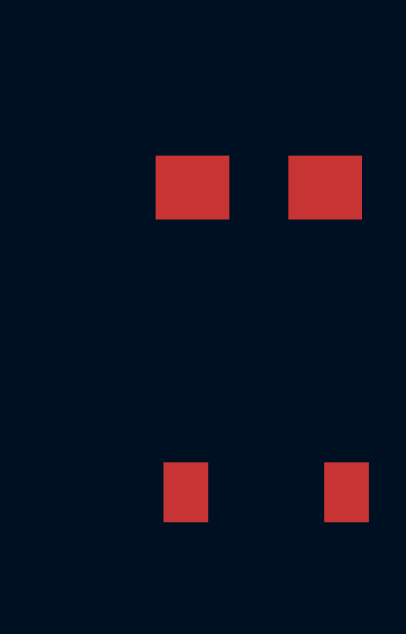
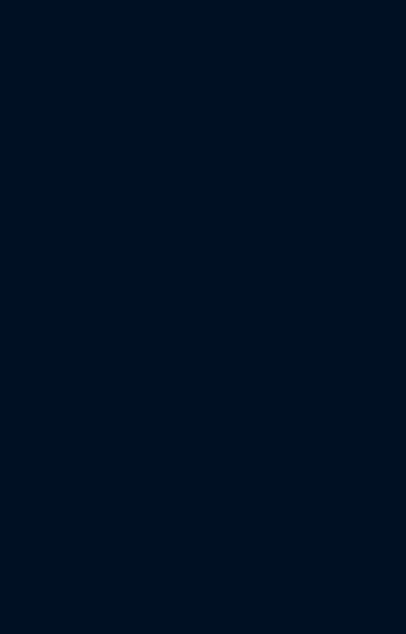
part: (258, 187) -> none
part: (266, 492) -> none

